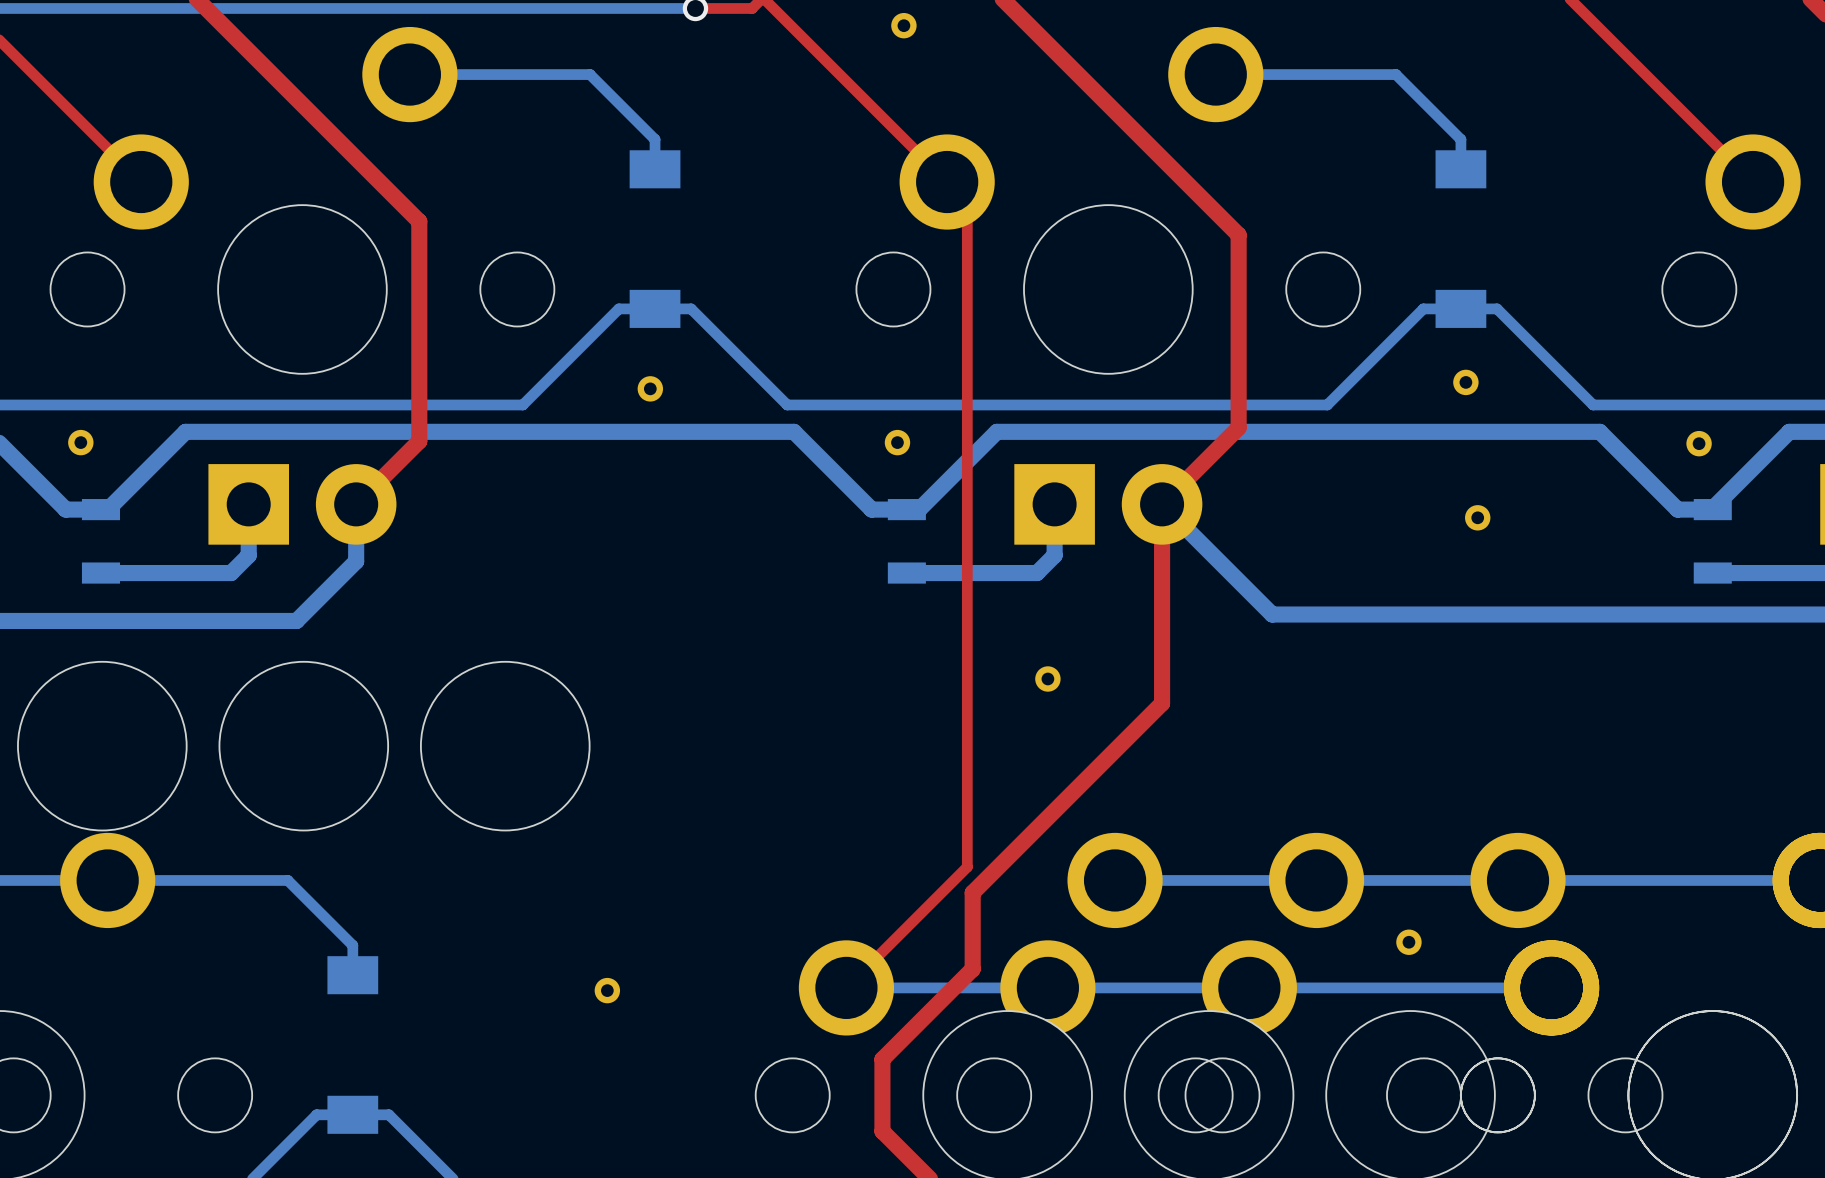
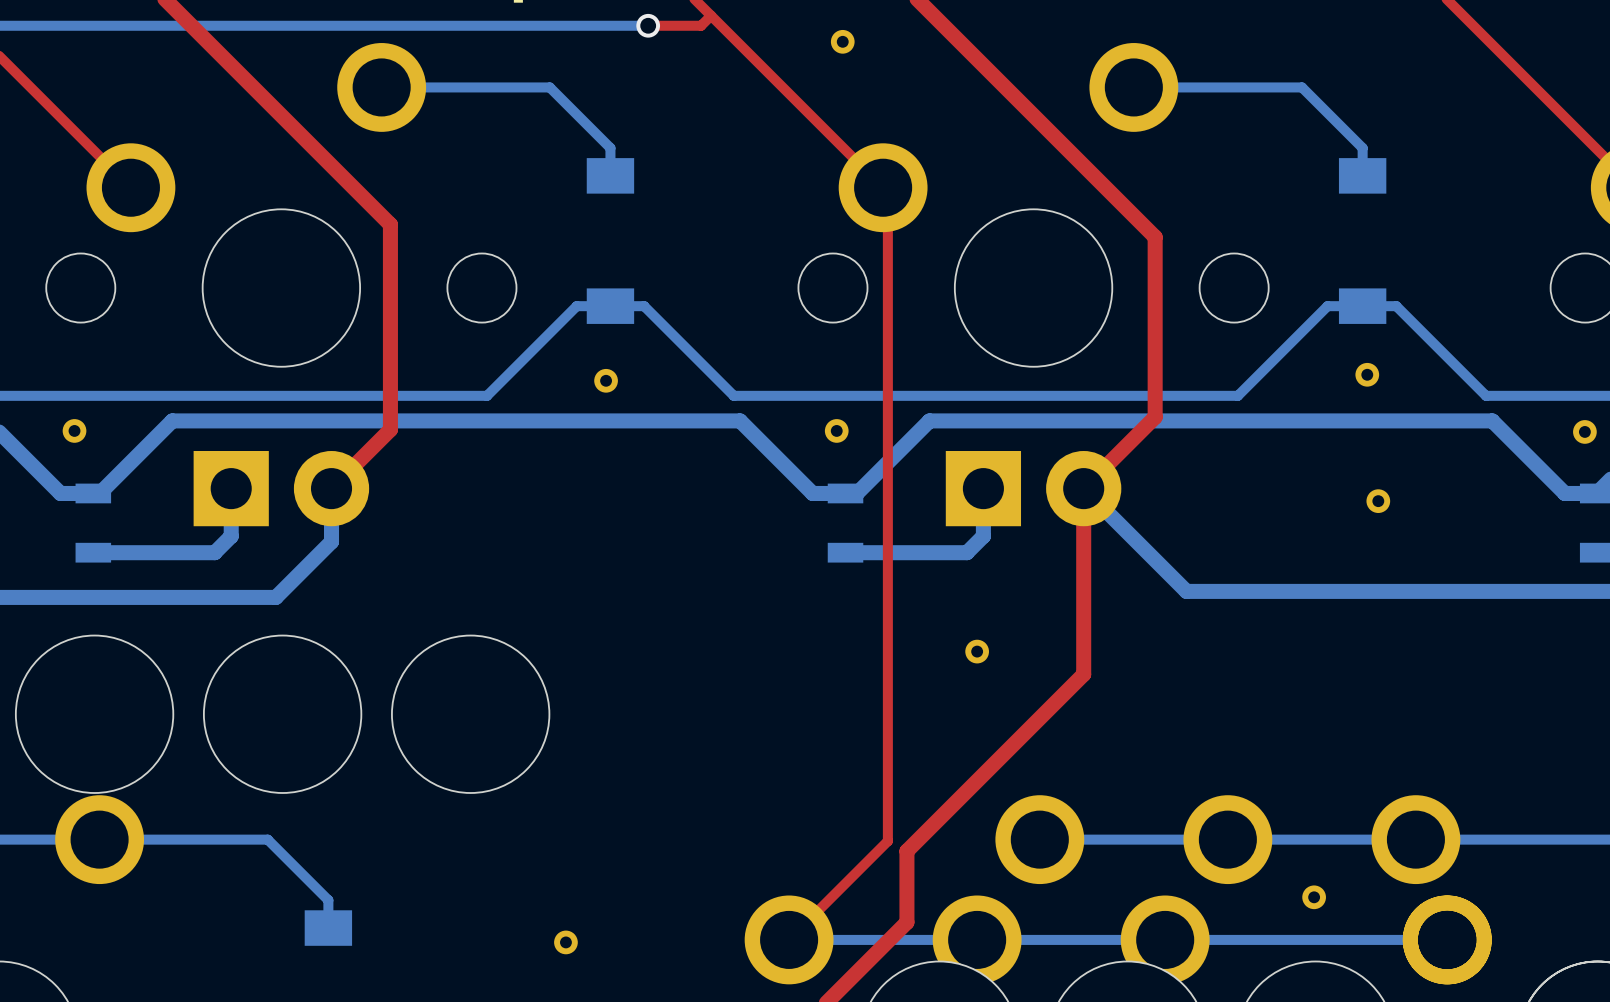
top track: (952, 187) (967, 202) (967, 867) (952, 882) -> (887, 192) (887, 841)

